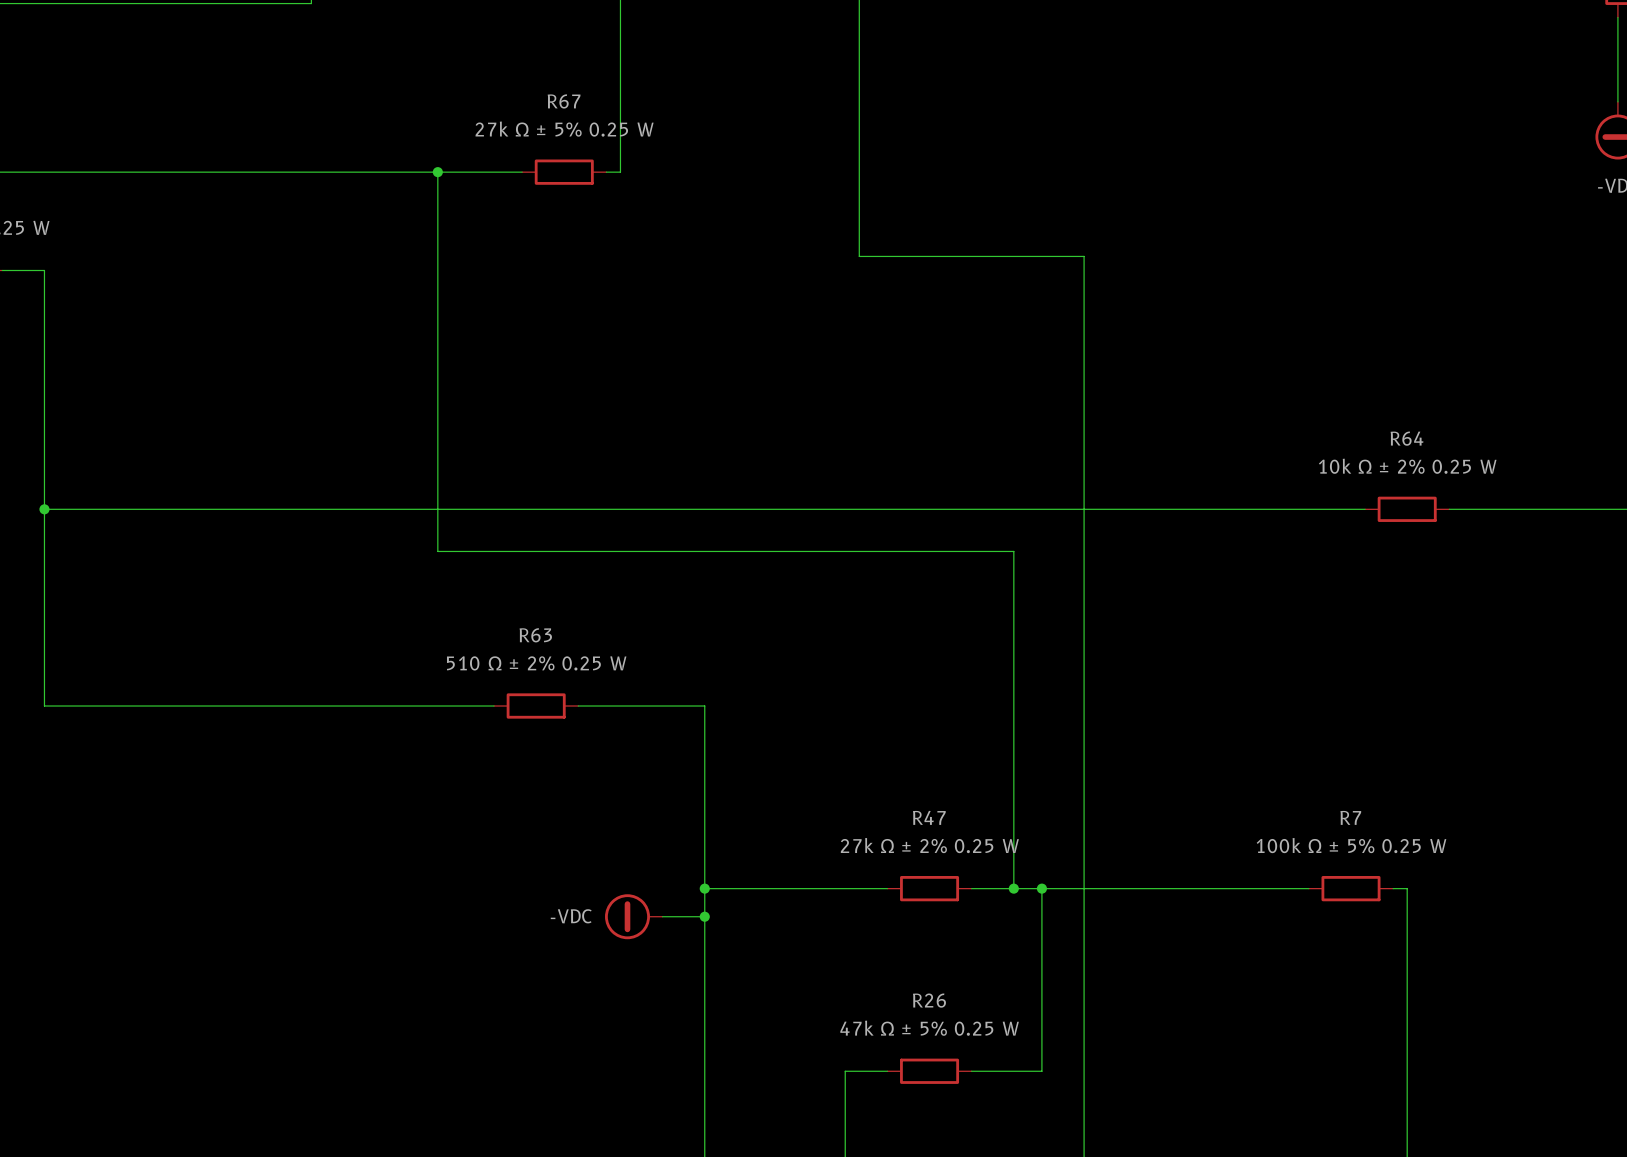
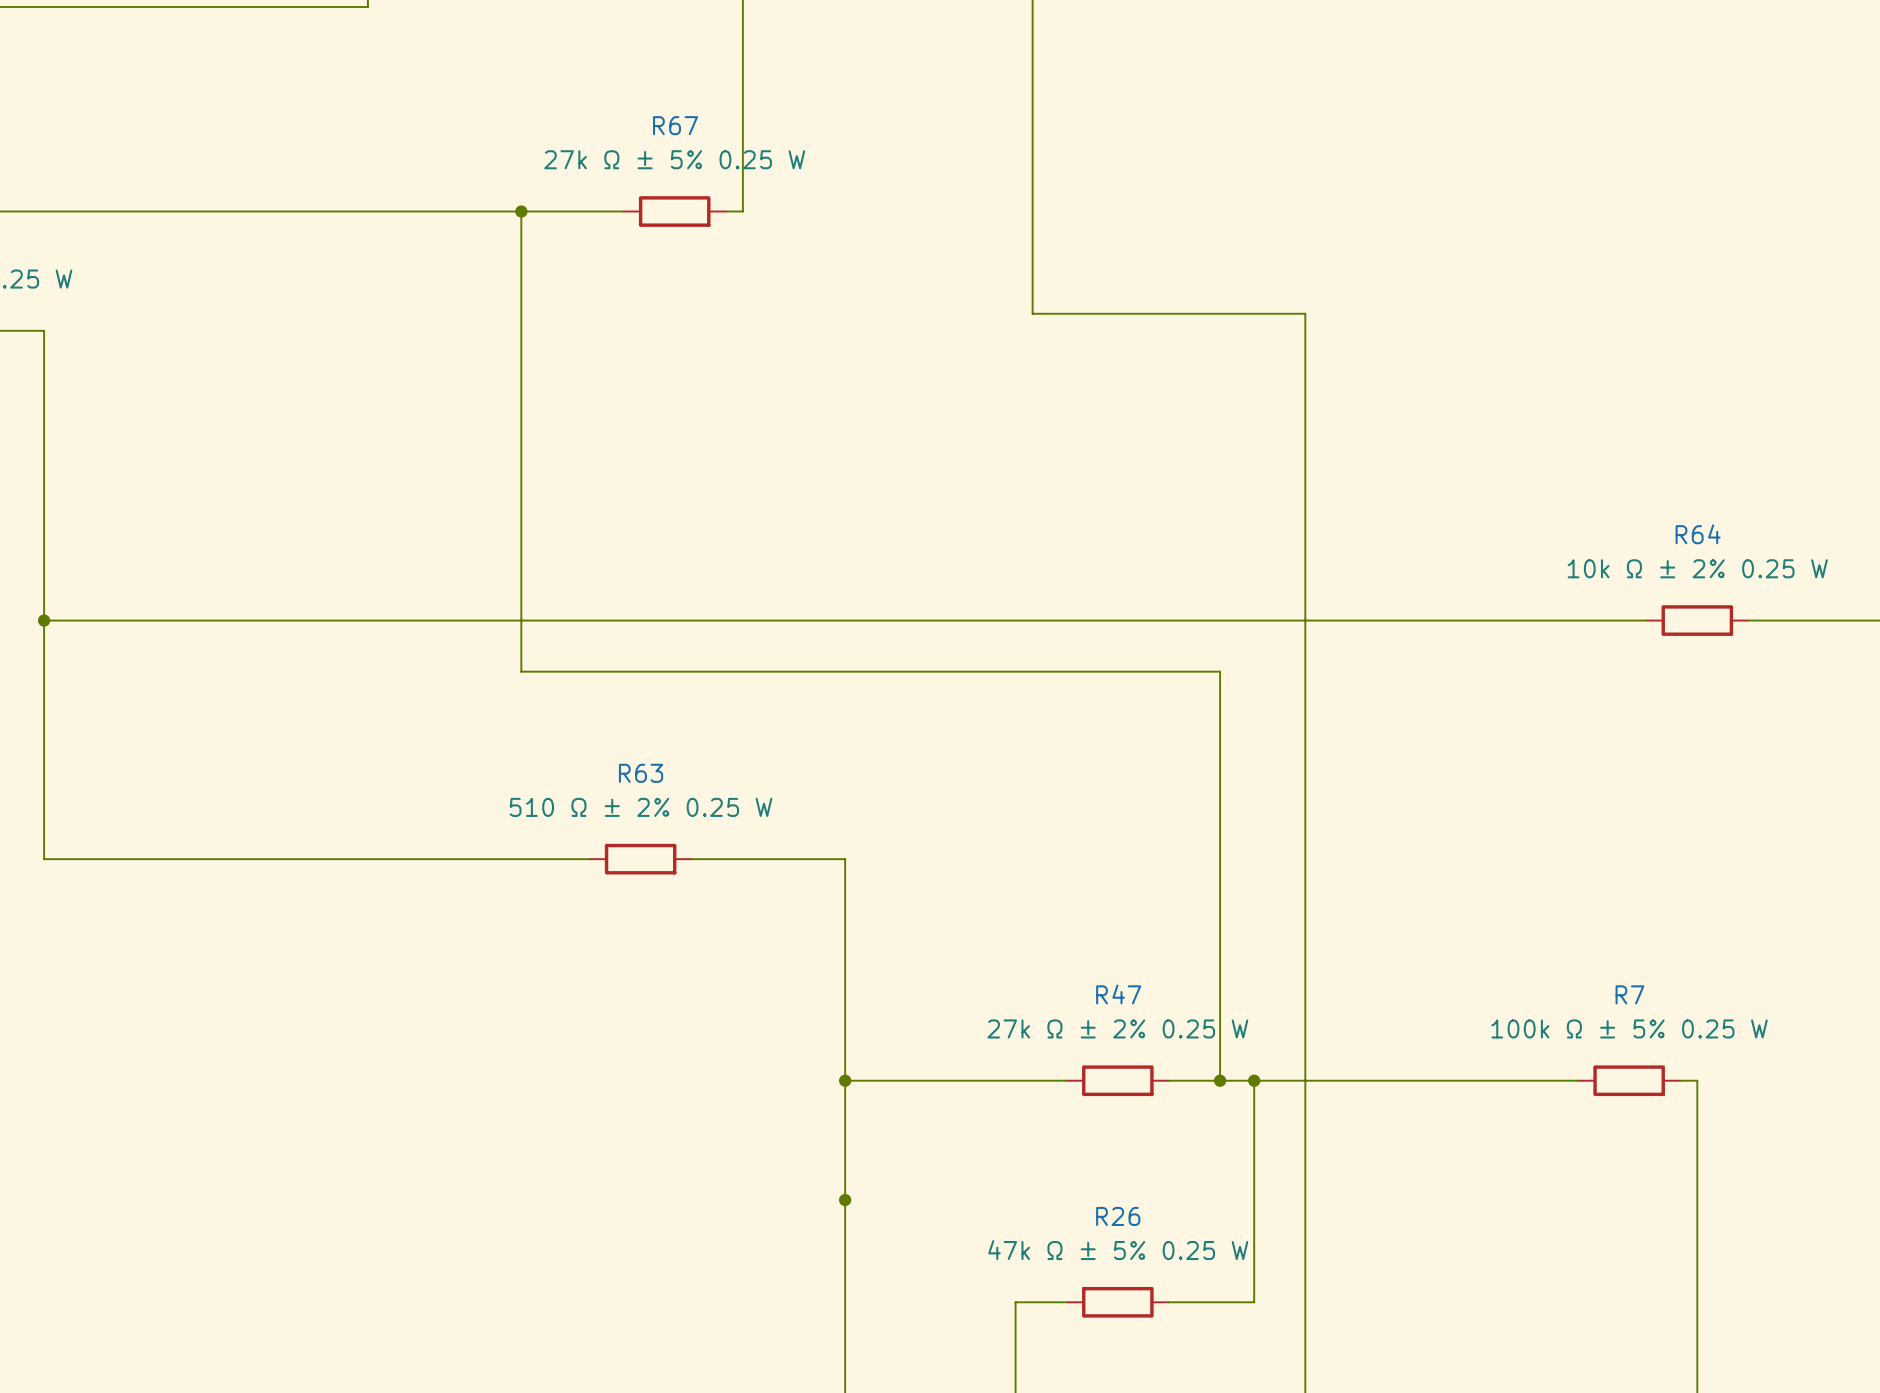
power symbol: -VDC (633, 916) -> none
wire: (662, 916) (704, 916) -> none
junction: (704, 916) -> none
junction: none -> (845, 1200)

